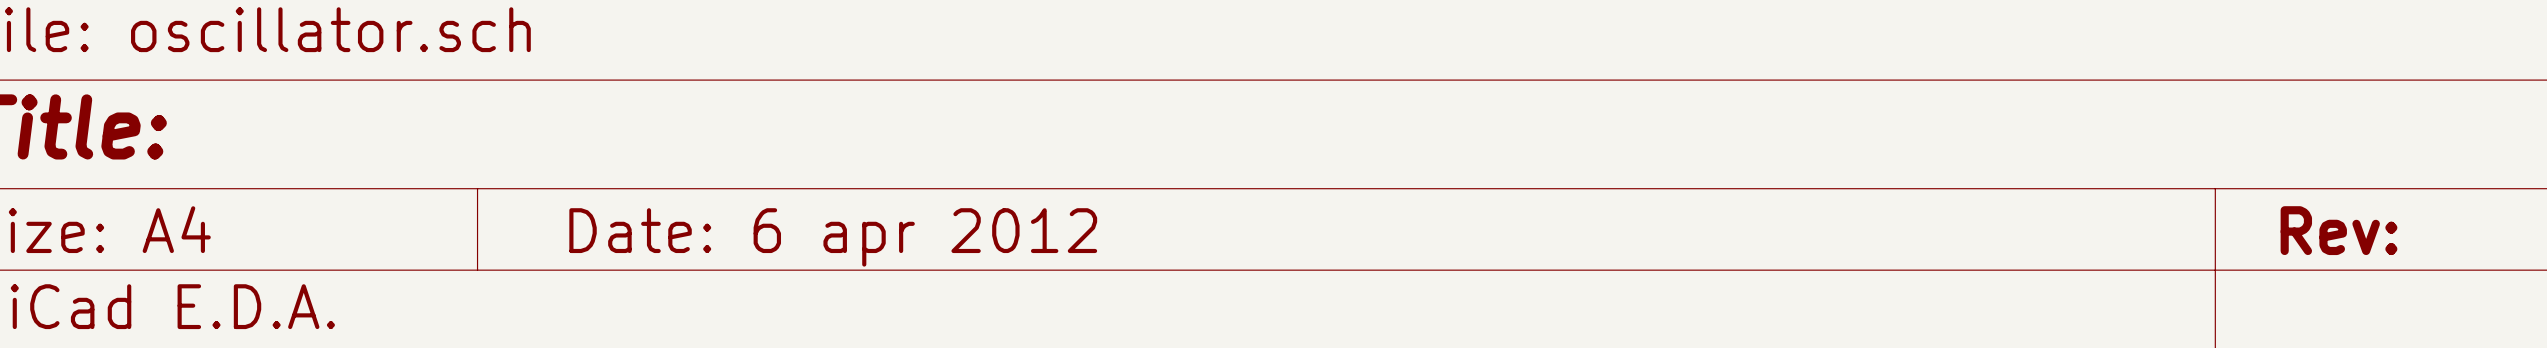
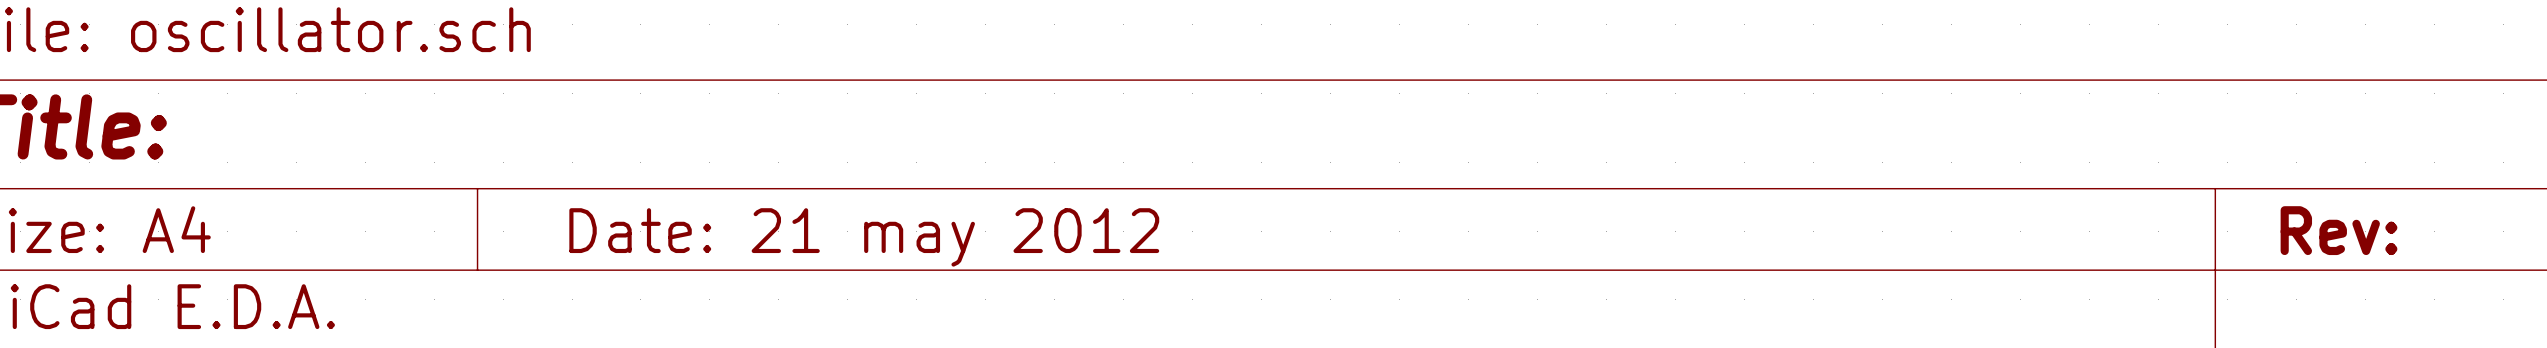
title block: Date: 6 apr 2012 (833, 237) -> Date: 21 may 2012 (864, 237)

